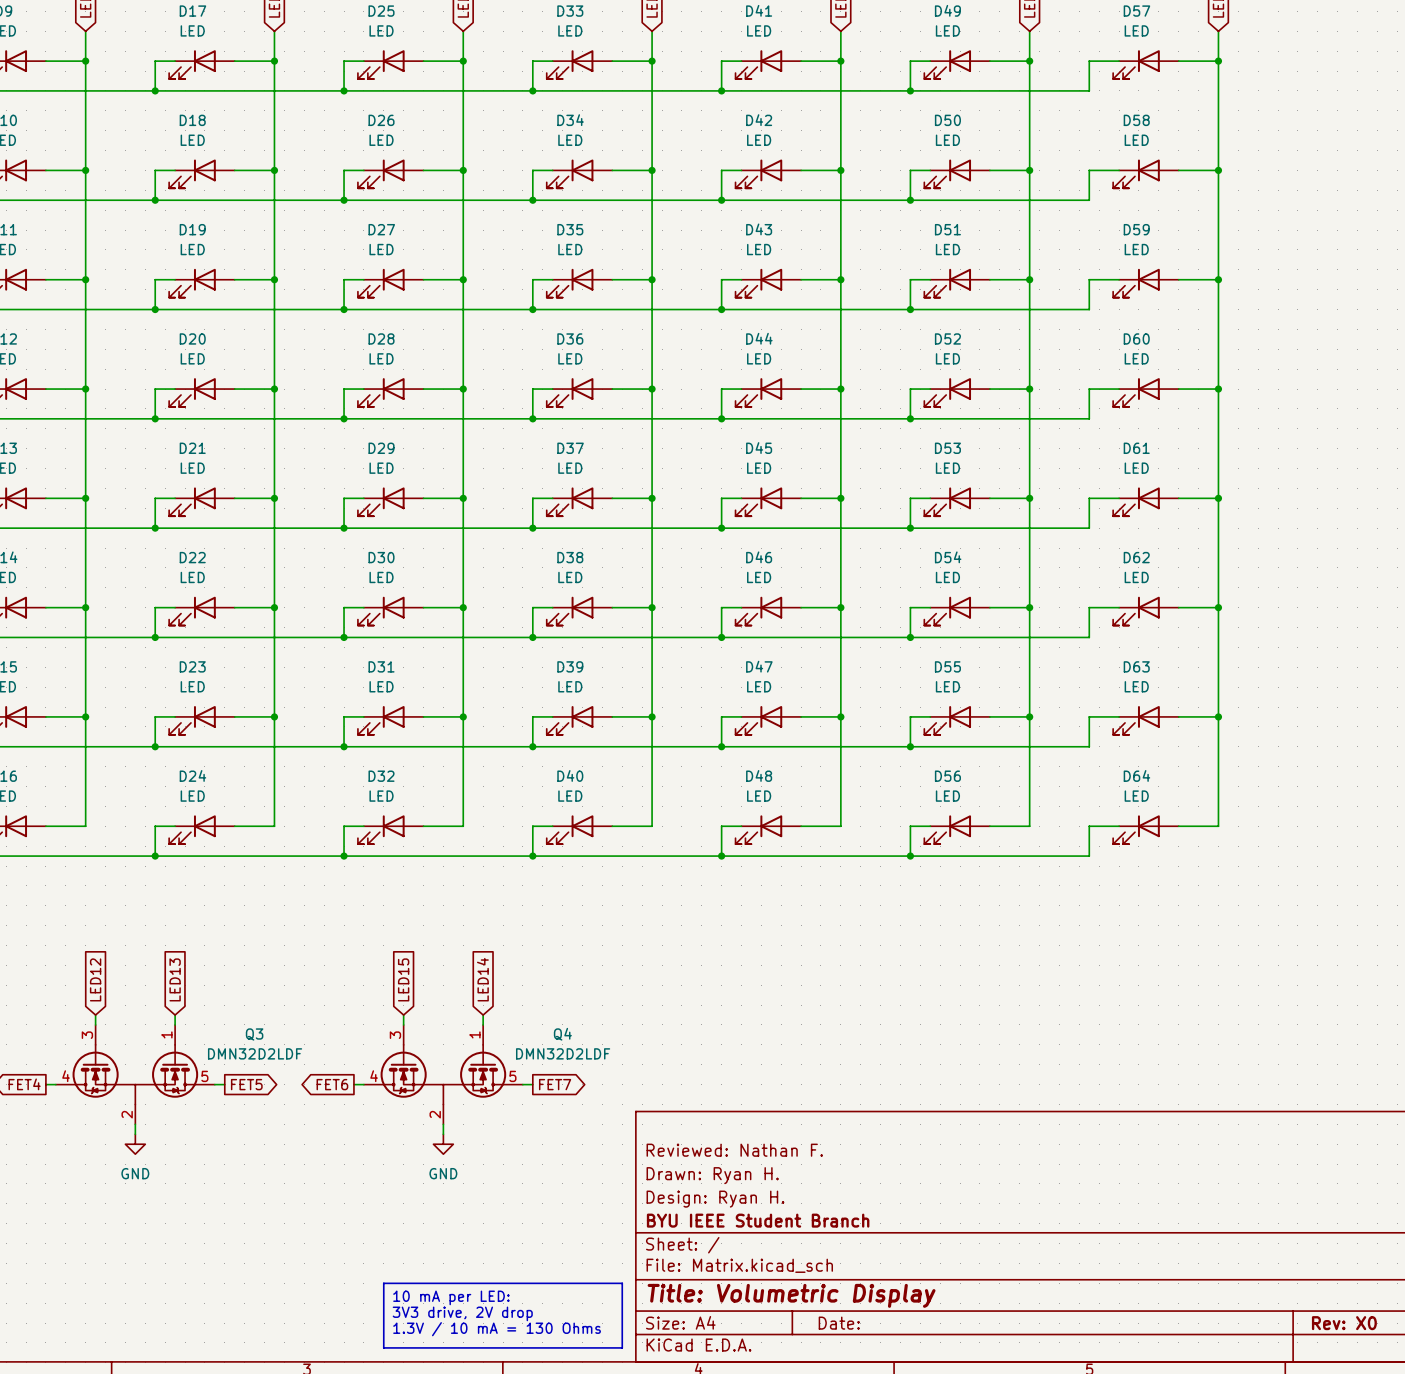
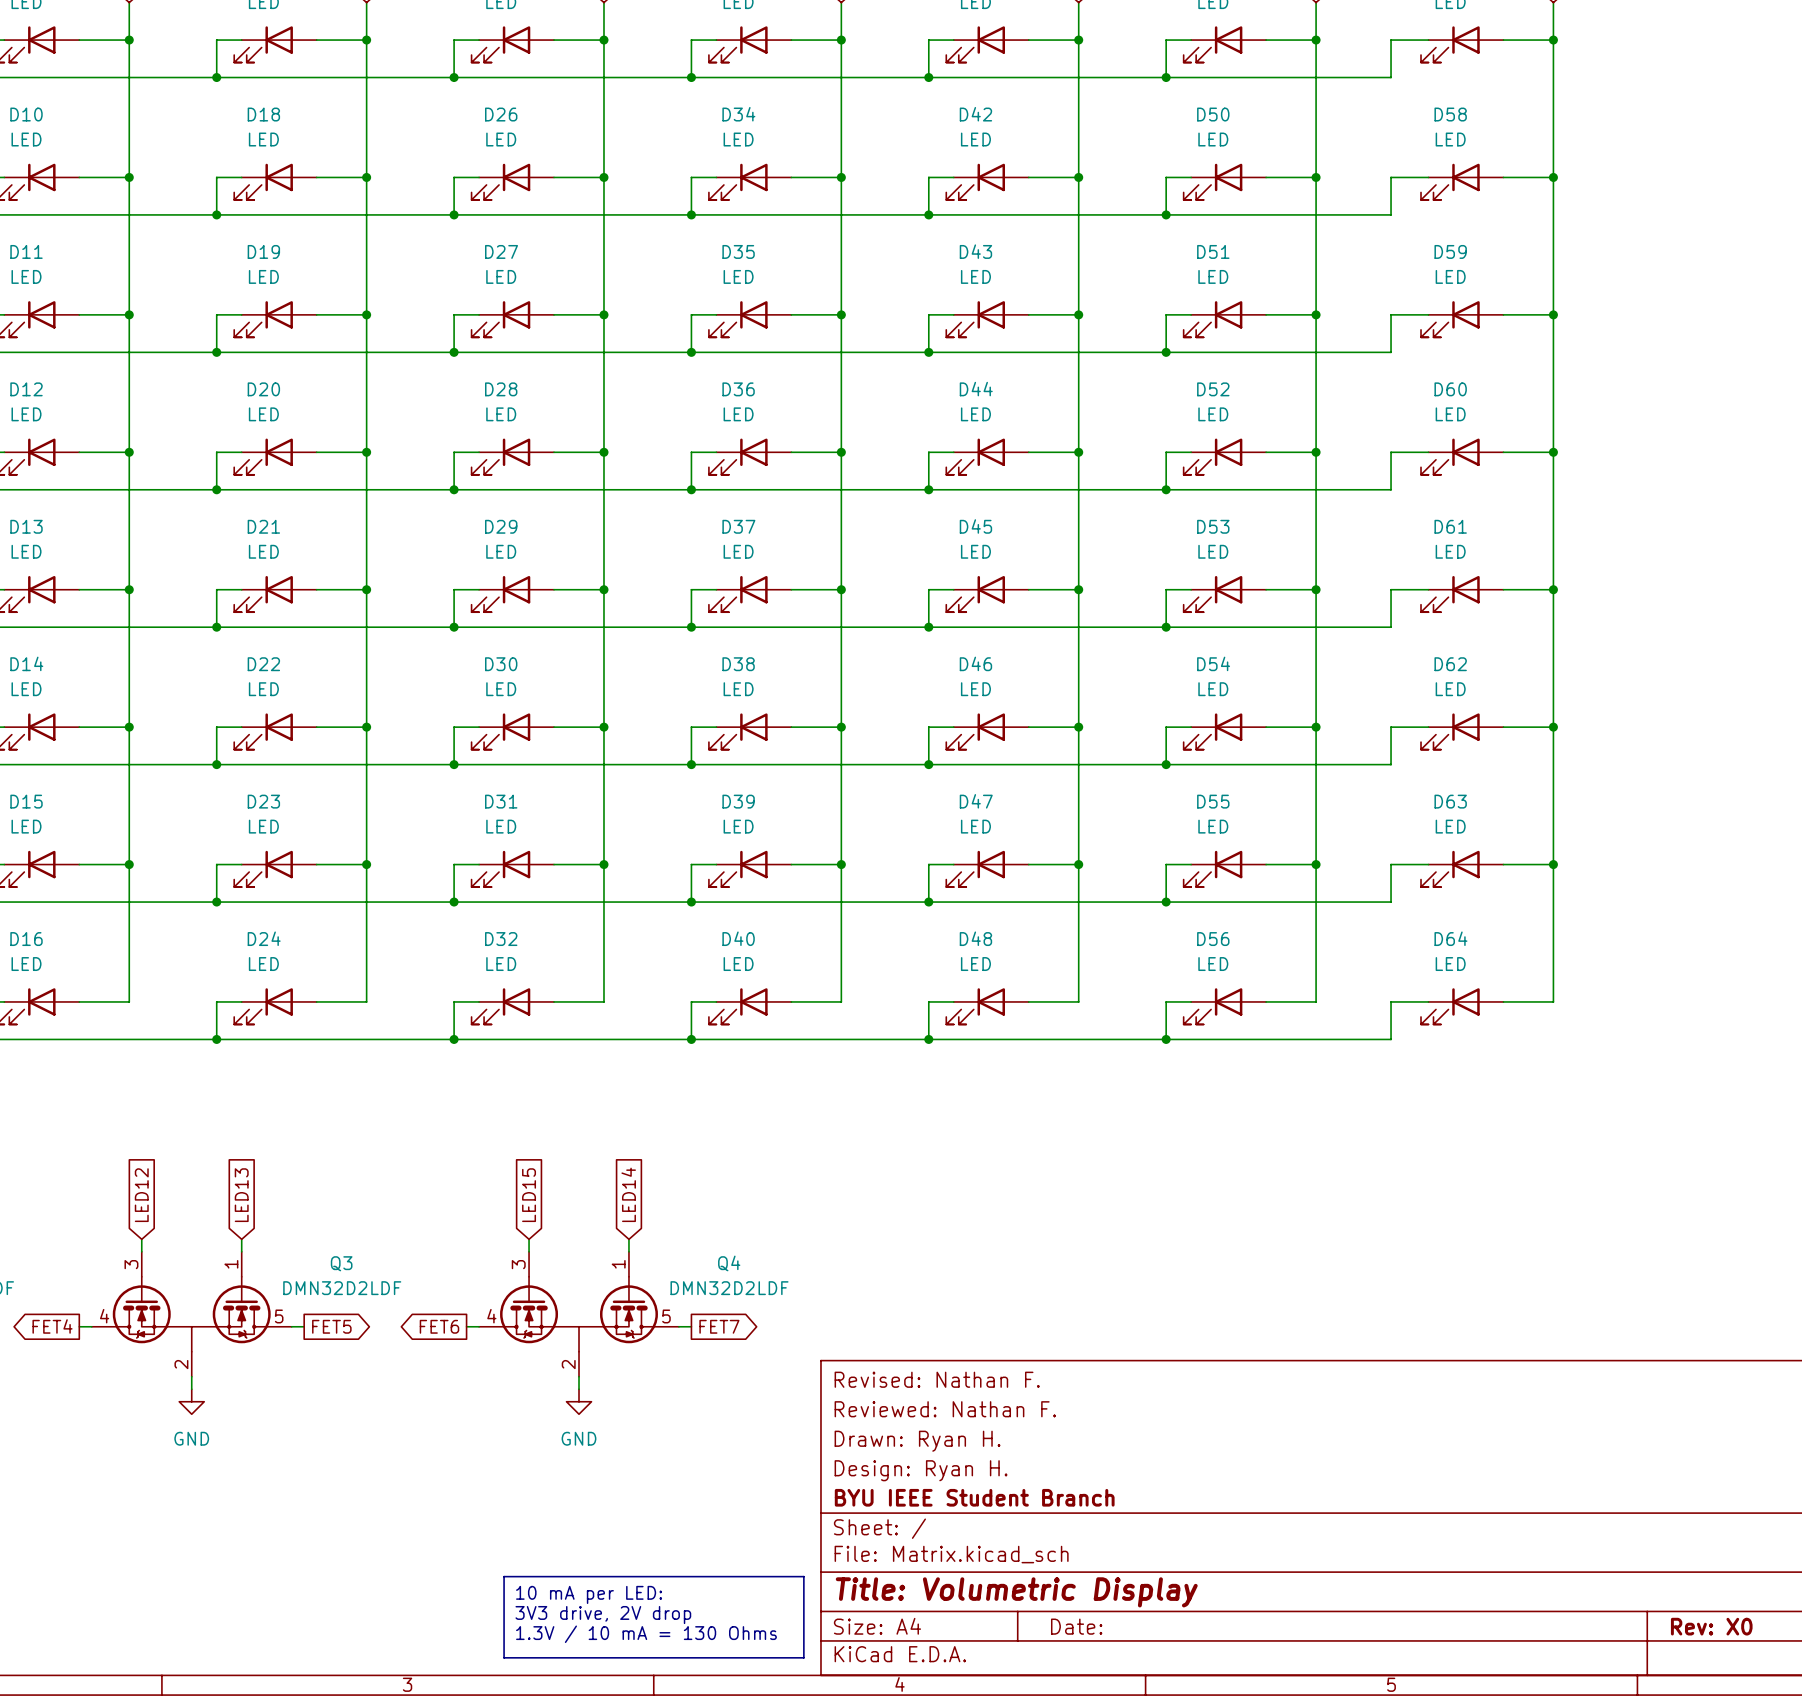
title block: none -> Revised: Nathan F. (937, 1379)

